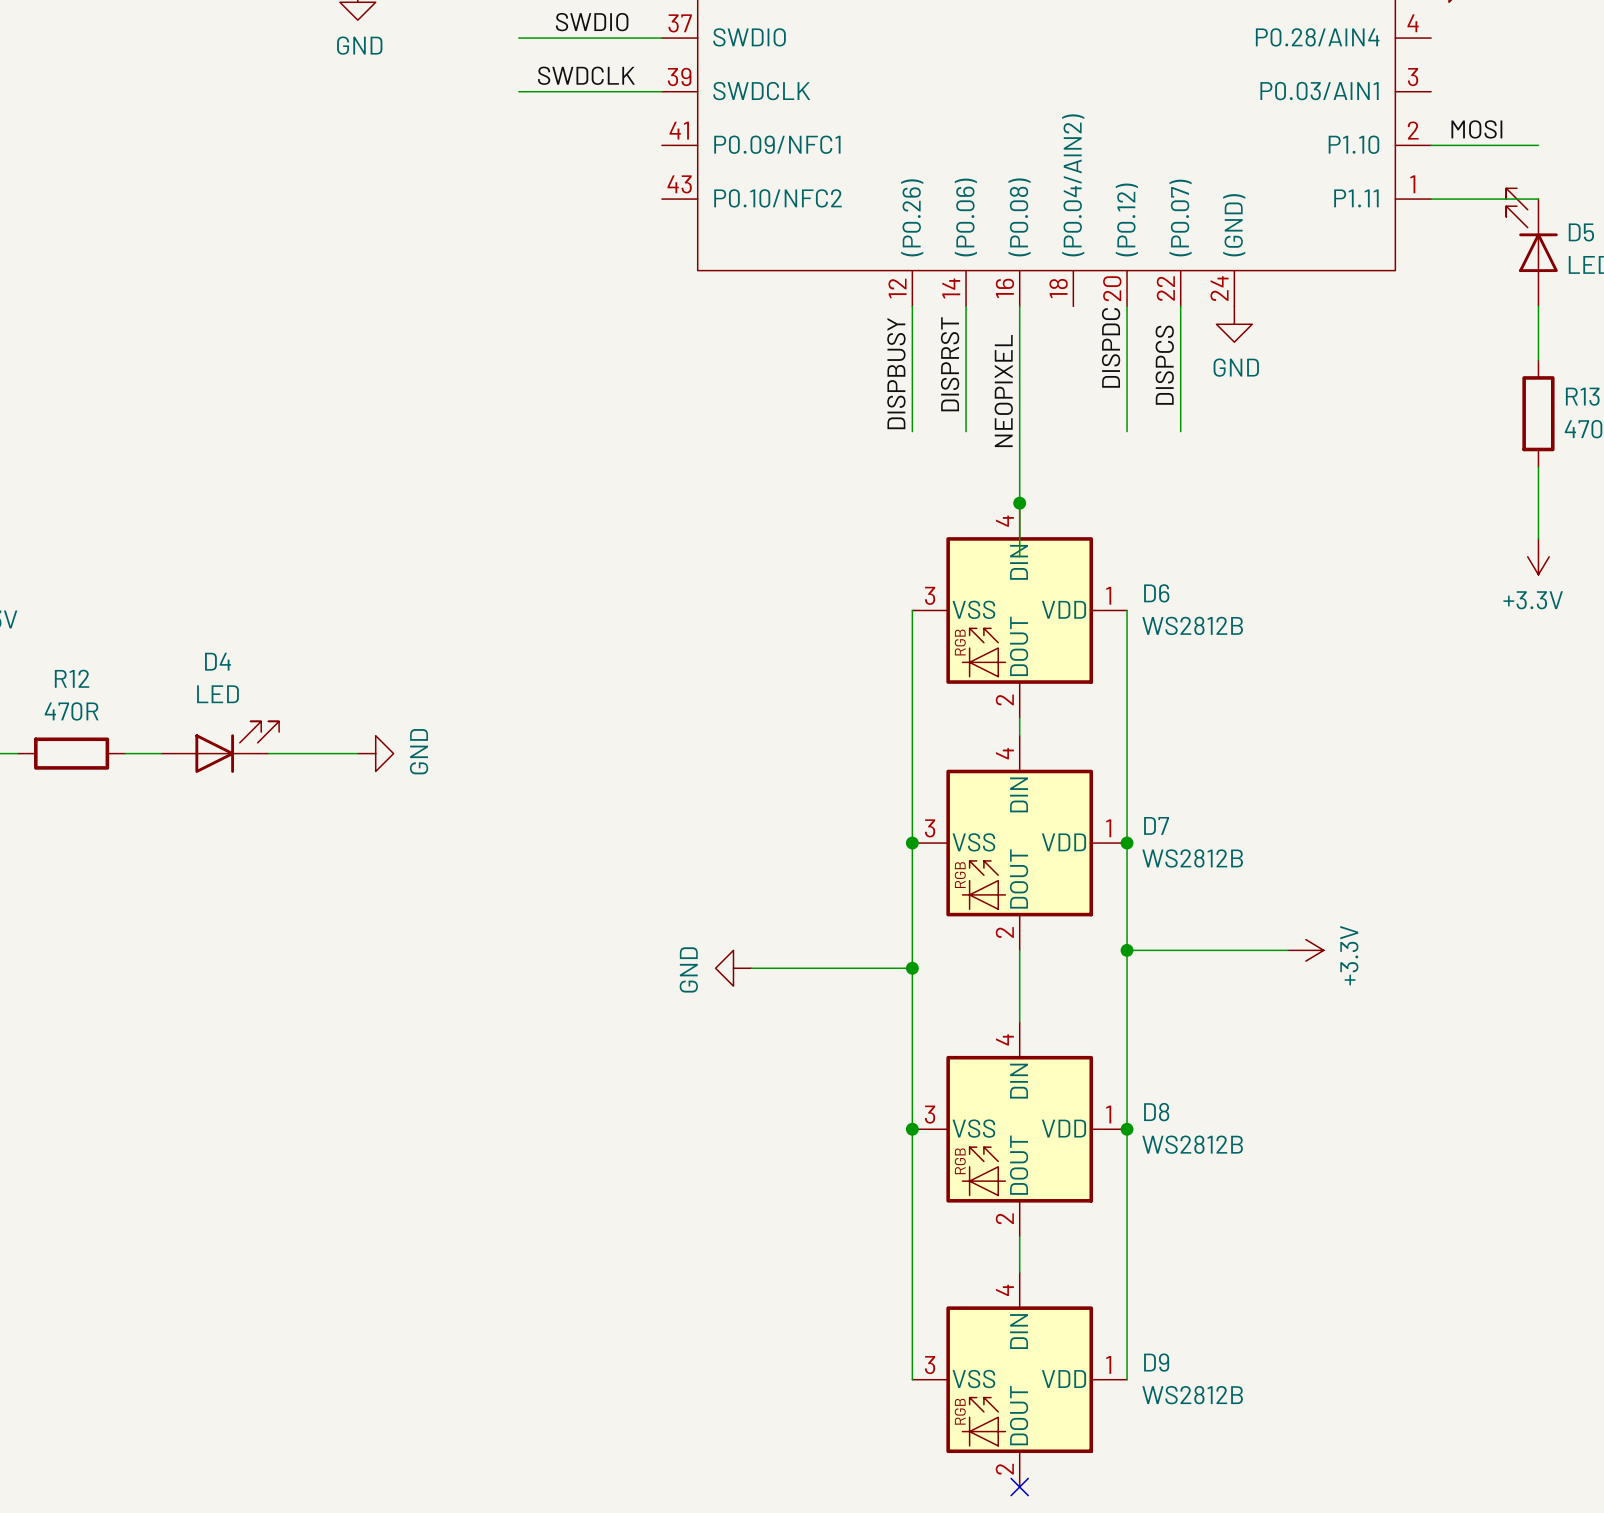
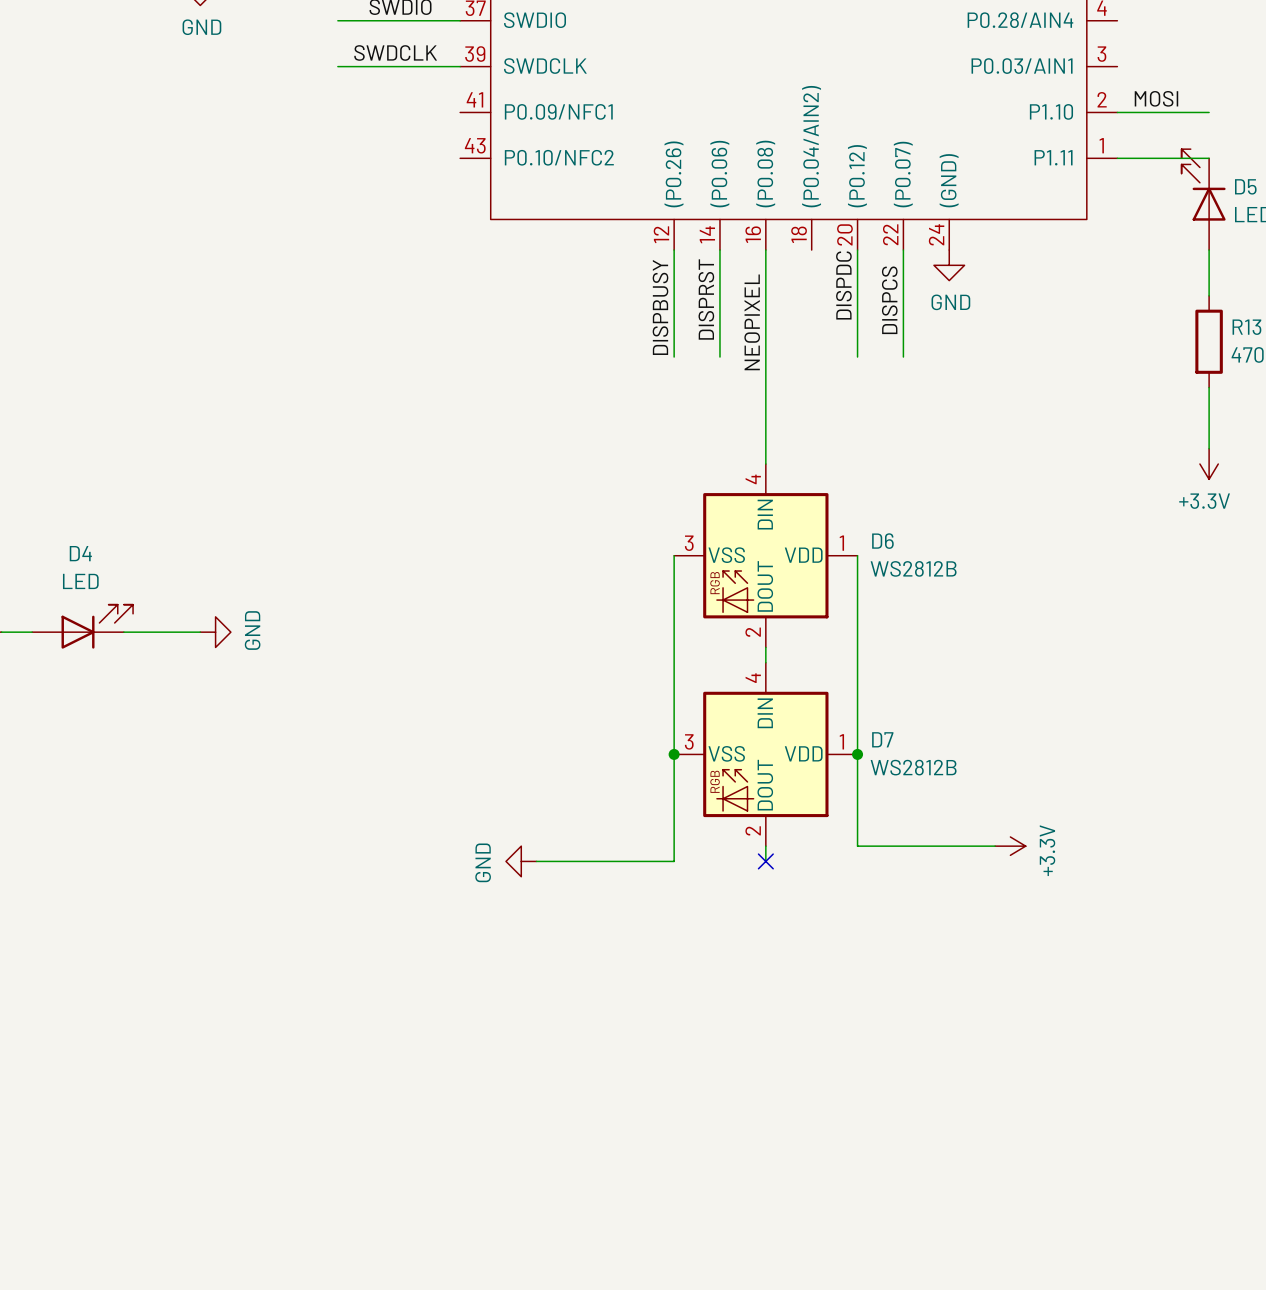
junction: (1019, 503) -> none
wire: (912, 610) (912, 664) -> none
D6 position: (1019, 610) -> (765, 555)
wire: (1127, 610) (1127, 664) -> none
junction: (912, 843) -> none
D7 position: (1019, 843) -> (765, 754)
junction: (1127, 843) -> none
junction: none -> (674, 754)
junction: none -> (857, 754)
wire: (1127, 950) (1288, 950) -> none
junction: (1127, 950) -> none
power symbol position: +3.3V (1305, 950) -> +3.3V (1010, 846)
power symbol position: GND (733, 968) -> GND (521, 861)
wire: (751, 968) (912, 968) -> none
junction: (912, 968) -> none
wire: (1127, 1004) (1127, 1379) -> (857, 846) (995, 846)
wire: (912, 1021) (912, 1379) -> (674, 861) (536, 861)
no-connect mark: none -> (765, 861)
junction: (912, 1129) -> none
D8: WS2812B (1019, 1129) -> none
junction: (1127, 1129) -> none
wire: (1019, 1236) (1019, 1272) -> none
D9: WS2812B (1019, 1379) -> none
no-connect mark: (1019, 1487) -> none

